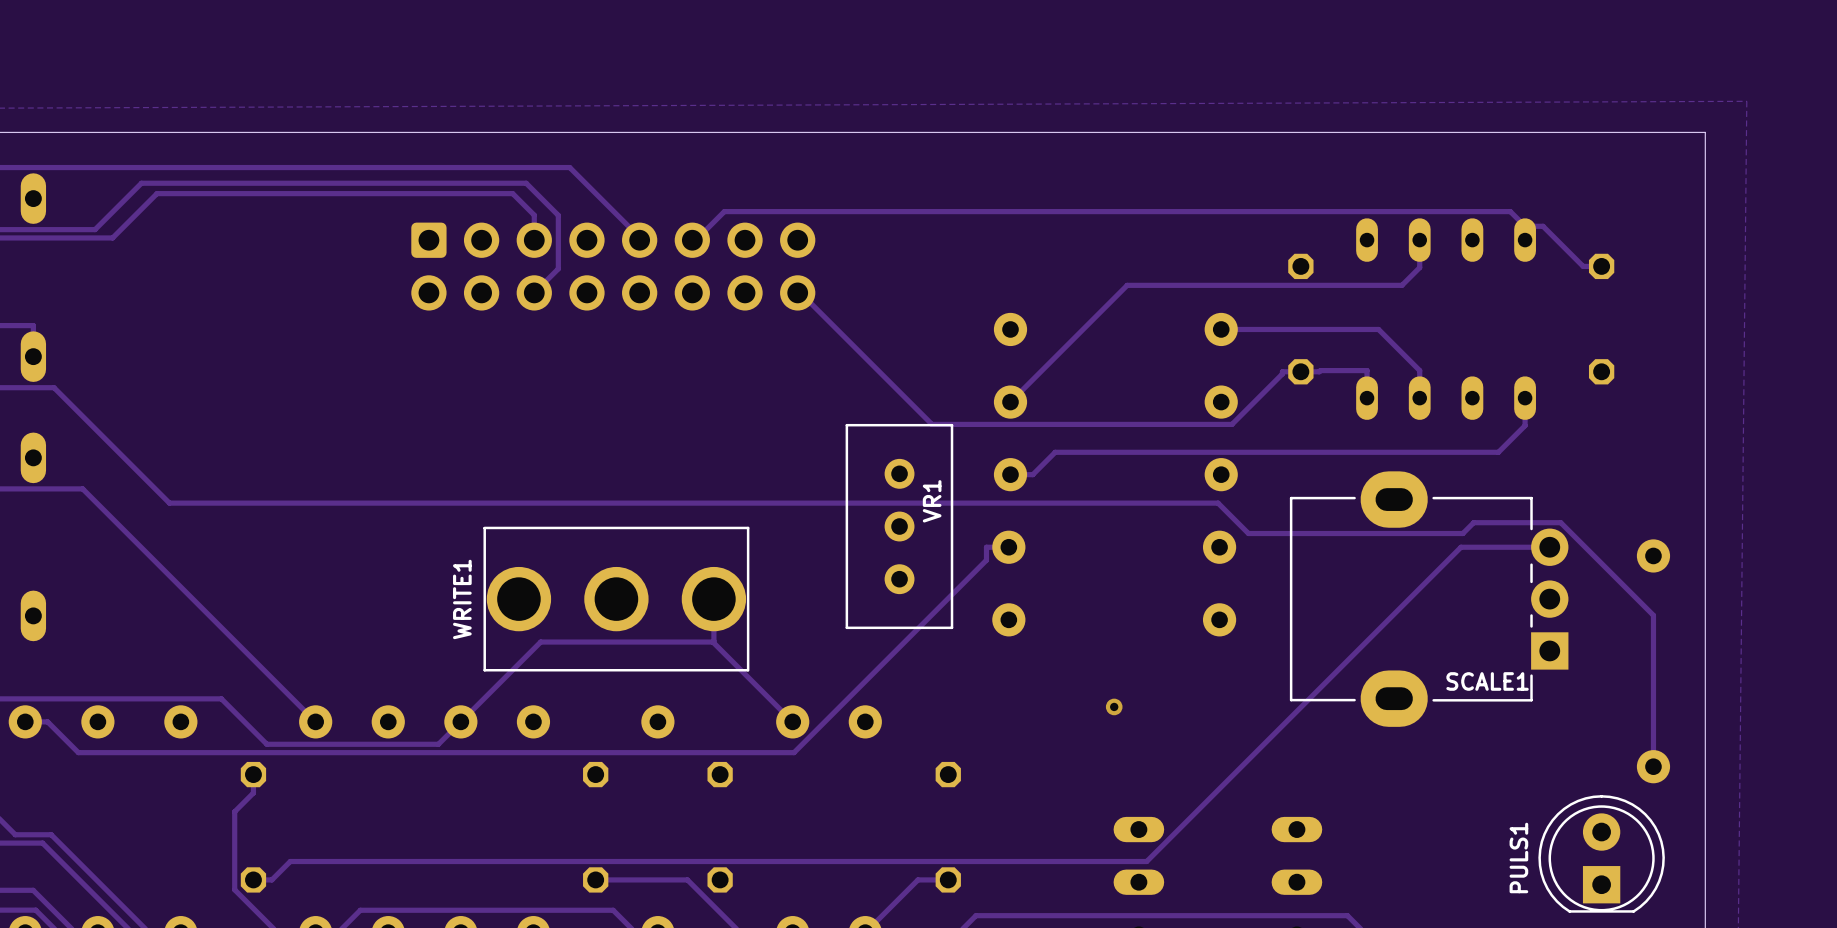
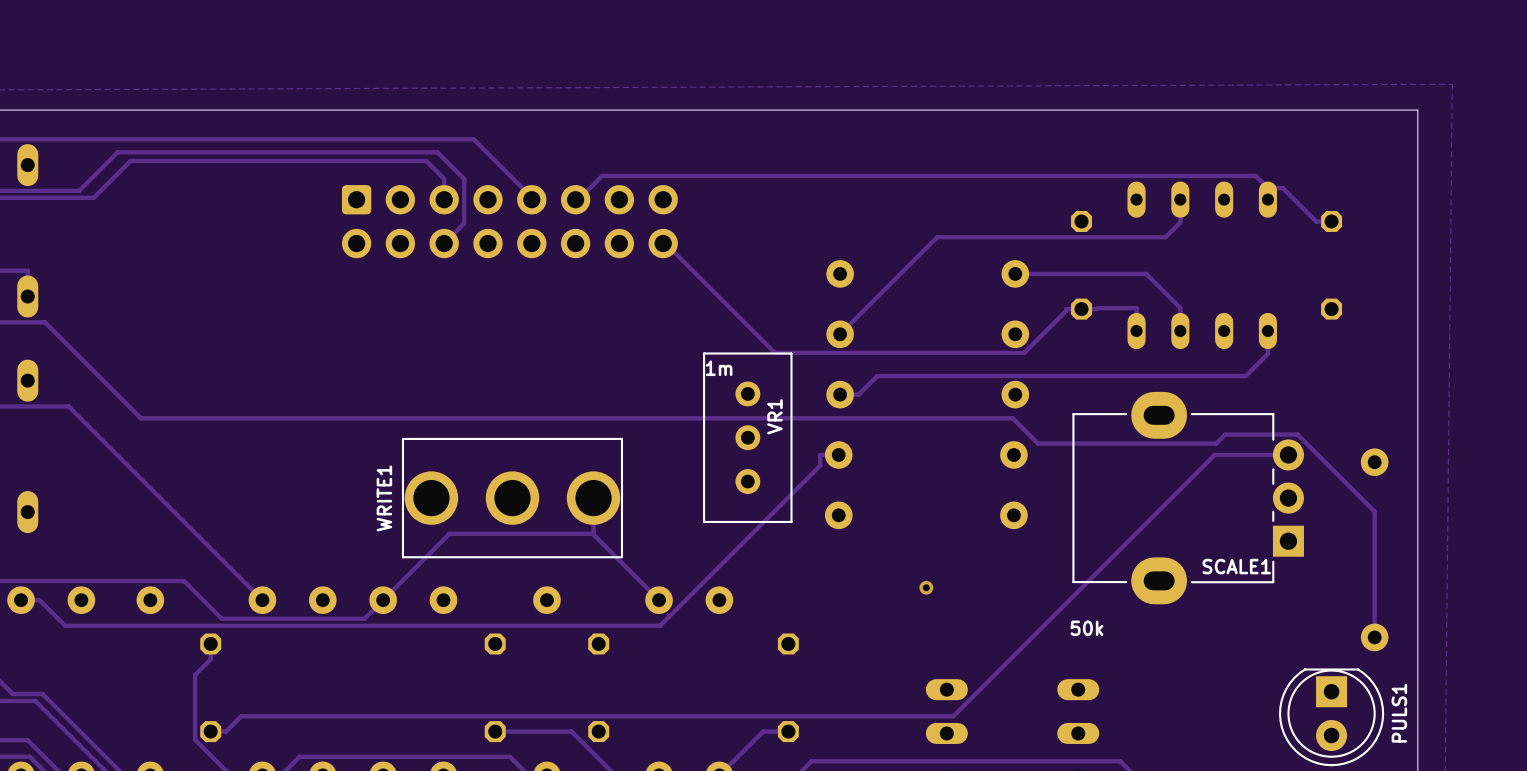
VR1 value: none -> 1m (719, 368)
SCALE1 value: none -> 50k (1086, 628)
PULS1 rotation: 0° (1601, 853) -> 180° (1331, 717)

